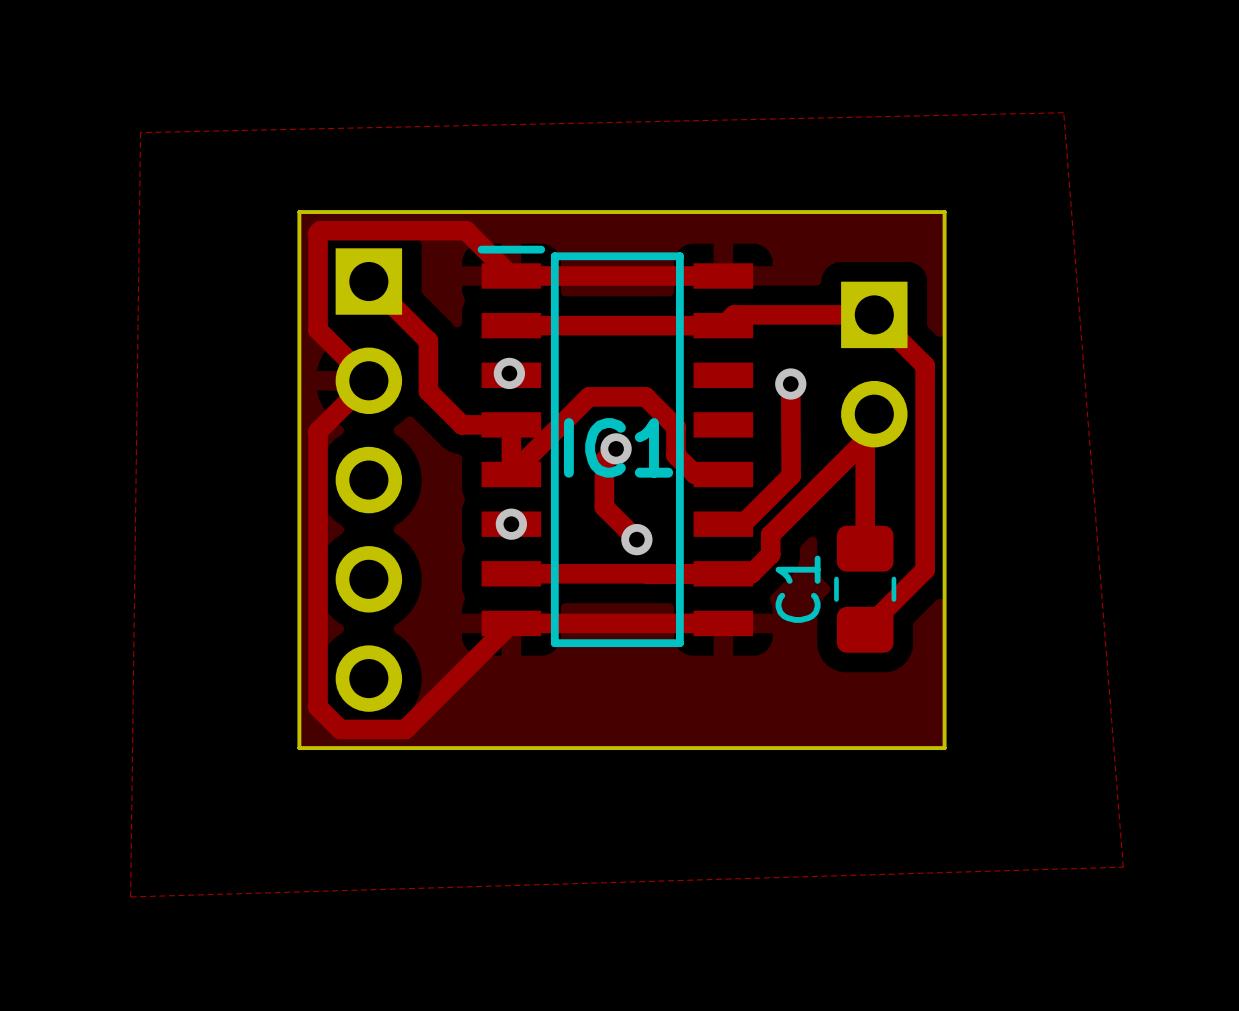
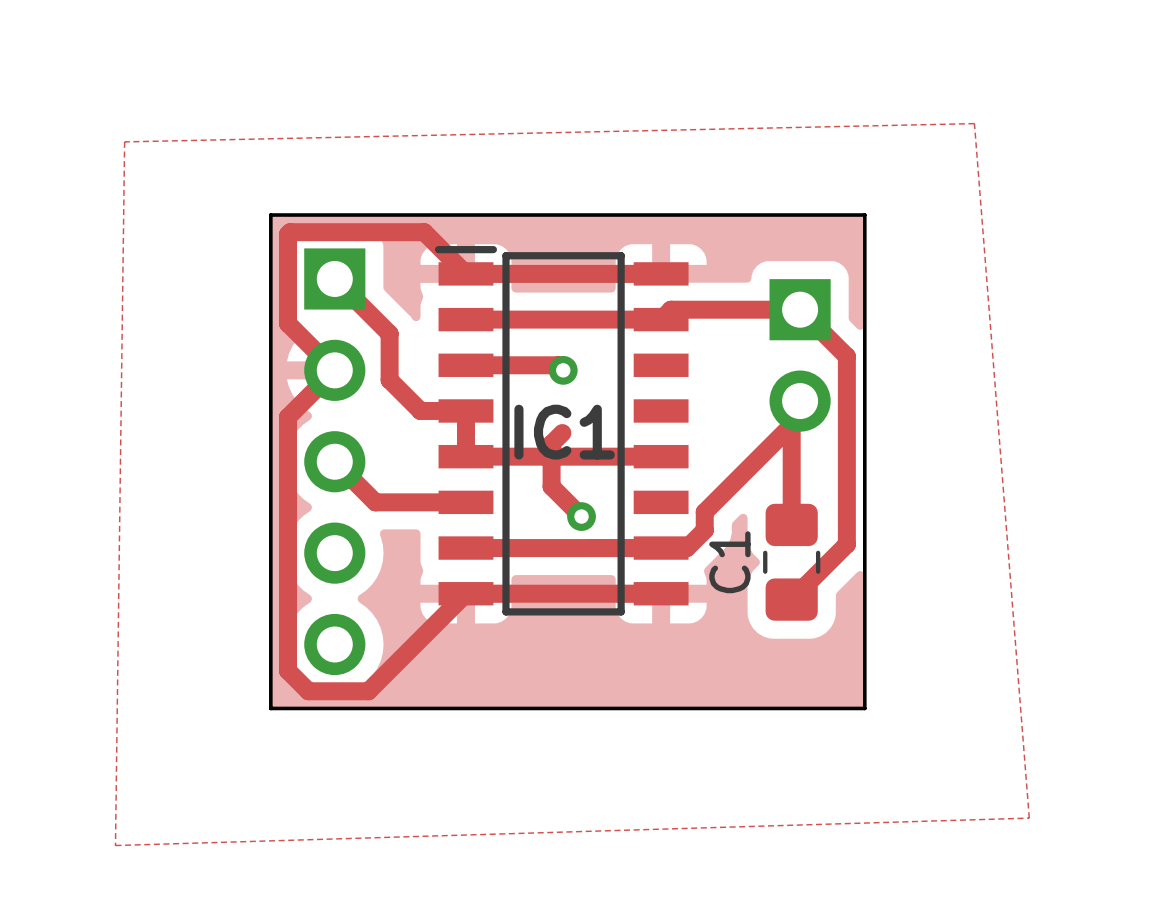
via: (509, 373) -> none
track: none -> (465, 365) (558, 365) (563, 370)
via: none -> (563, 370)
via: (790, 383) -> none
track: (791, 385) (790, 383) (791, 475) (742, 524) (723, 524) -> none
via: (616, 448) -> none
track: (511, 474) (589, 396) (645, 396) (675, 427) (675, 455) (695, 474) -> (465, 456) (635, 456)
track: none -> (334, 461) (375, 502) (465, 502)
via: (511, 524) -> none

